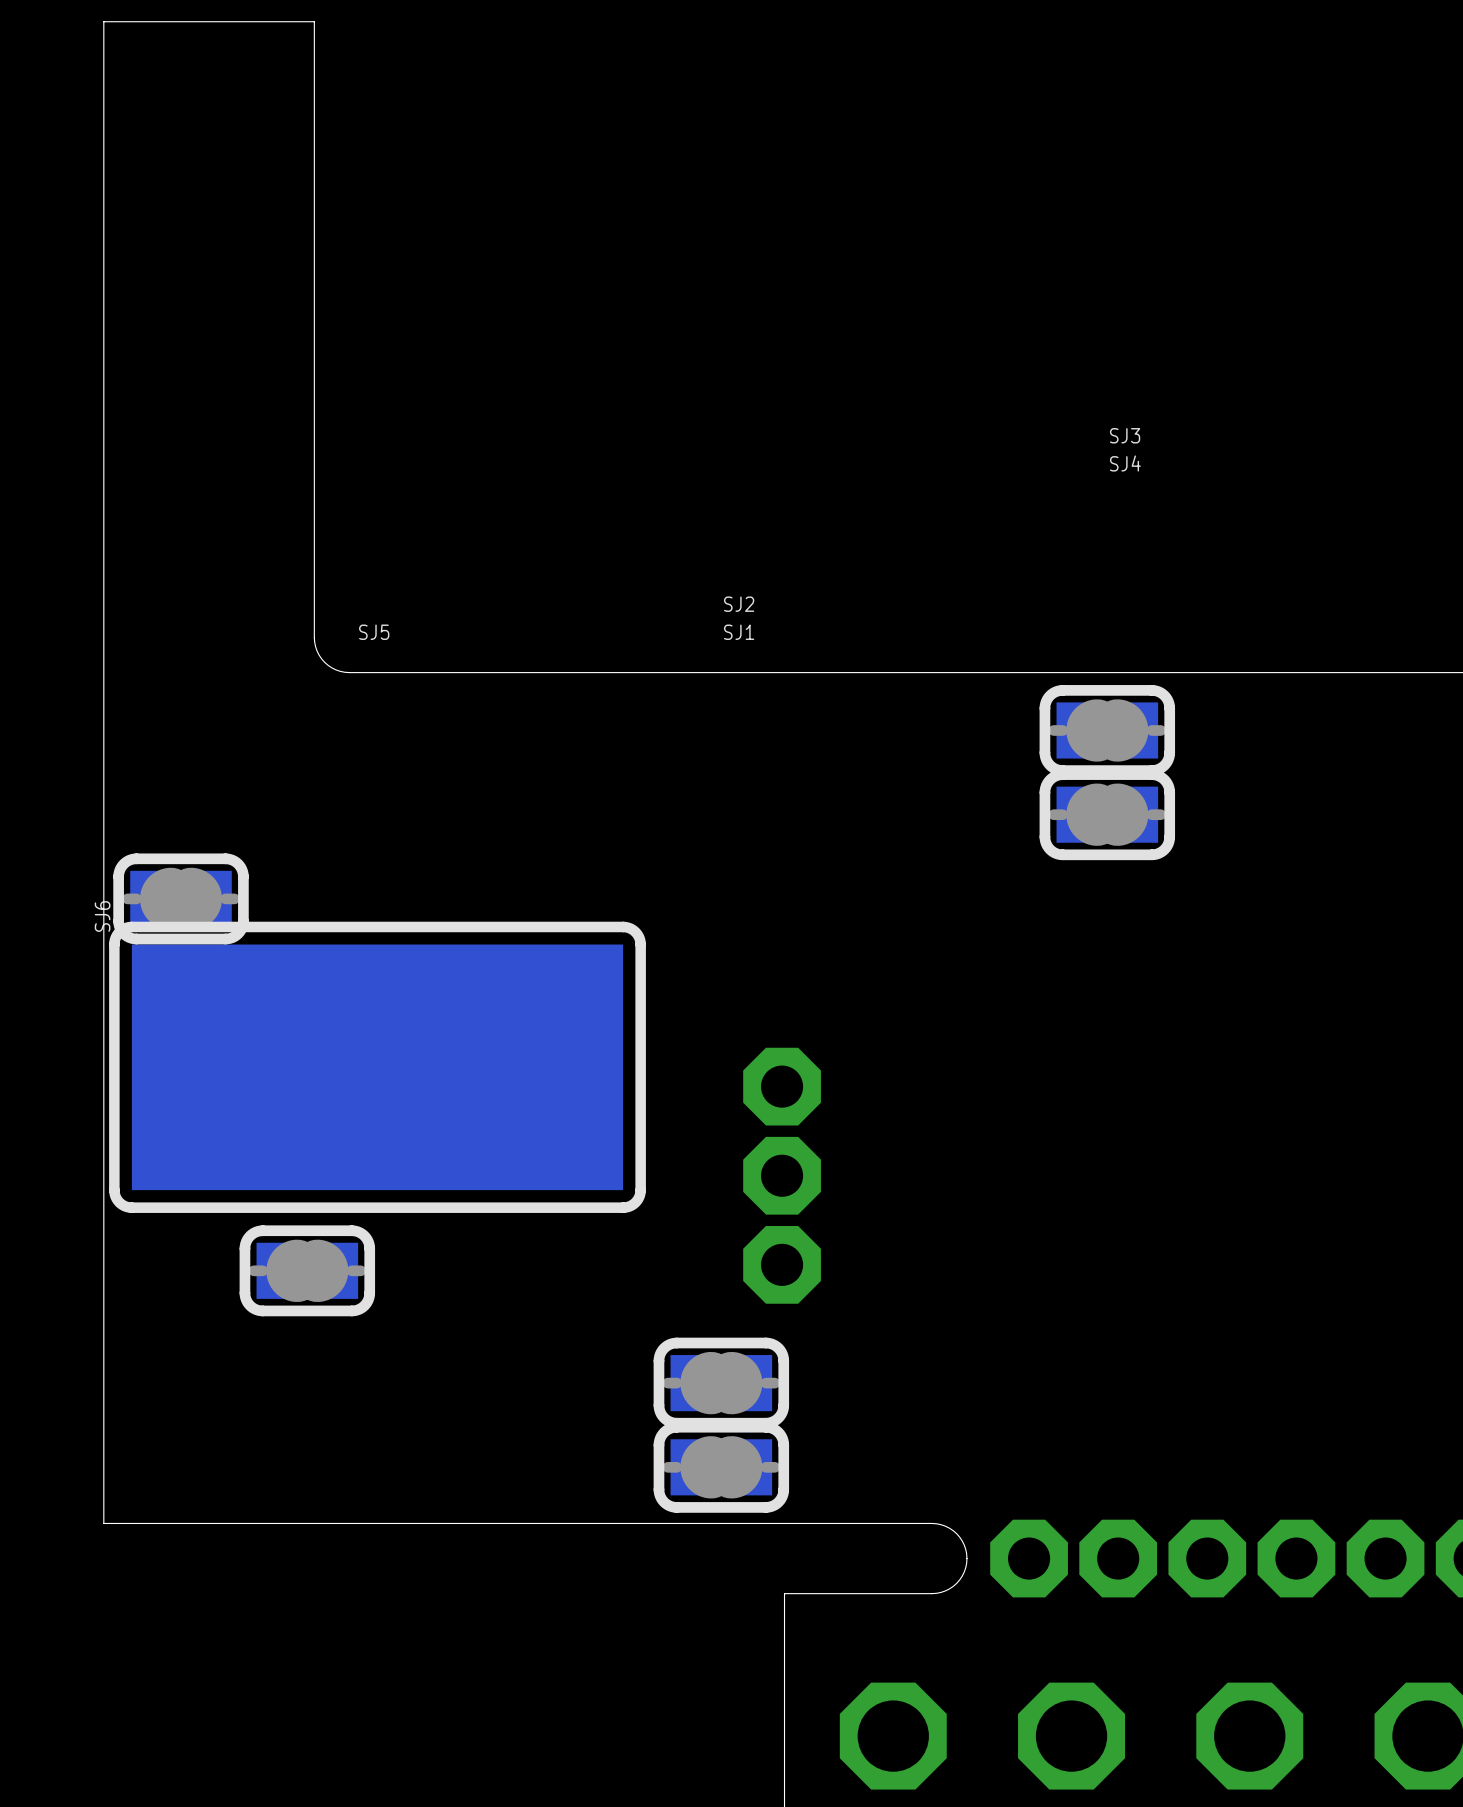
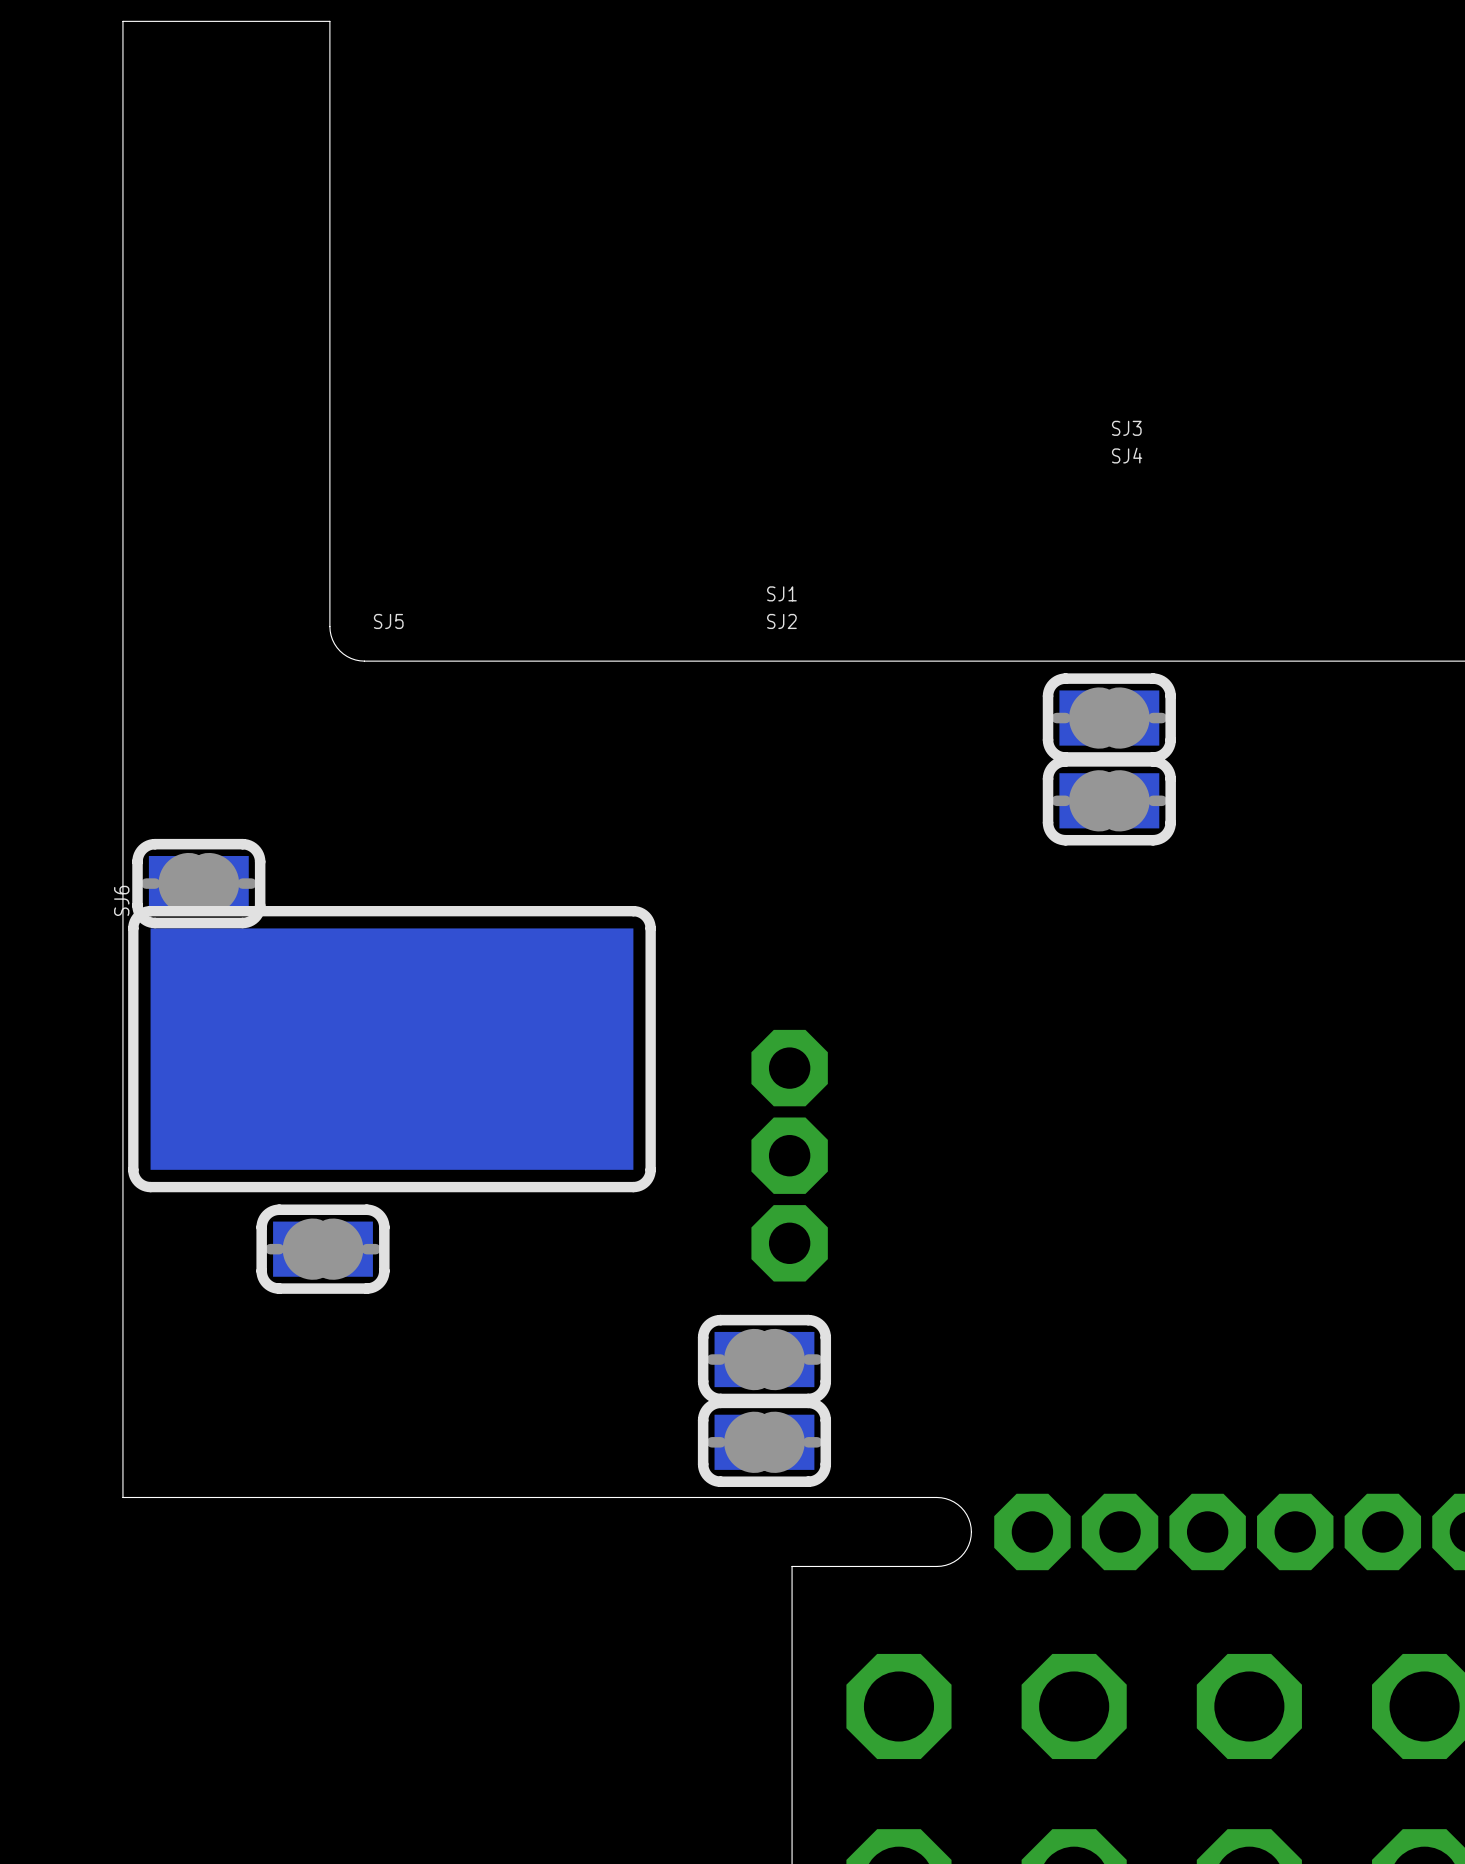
SJ2 name position: SJ2 (739, 604) -> SJ2 (781, 621)
SJ1 name position: SJ1 (739, 632) -> SJ1 (781, 593)
SJ2 position: (721, 1383) -> (764, 1442)
SJ1 position: (721, 1467) -> (764, 1359)

